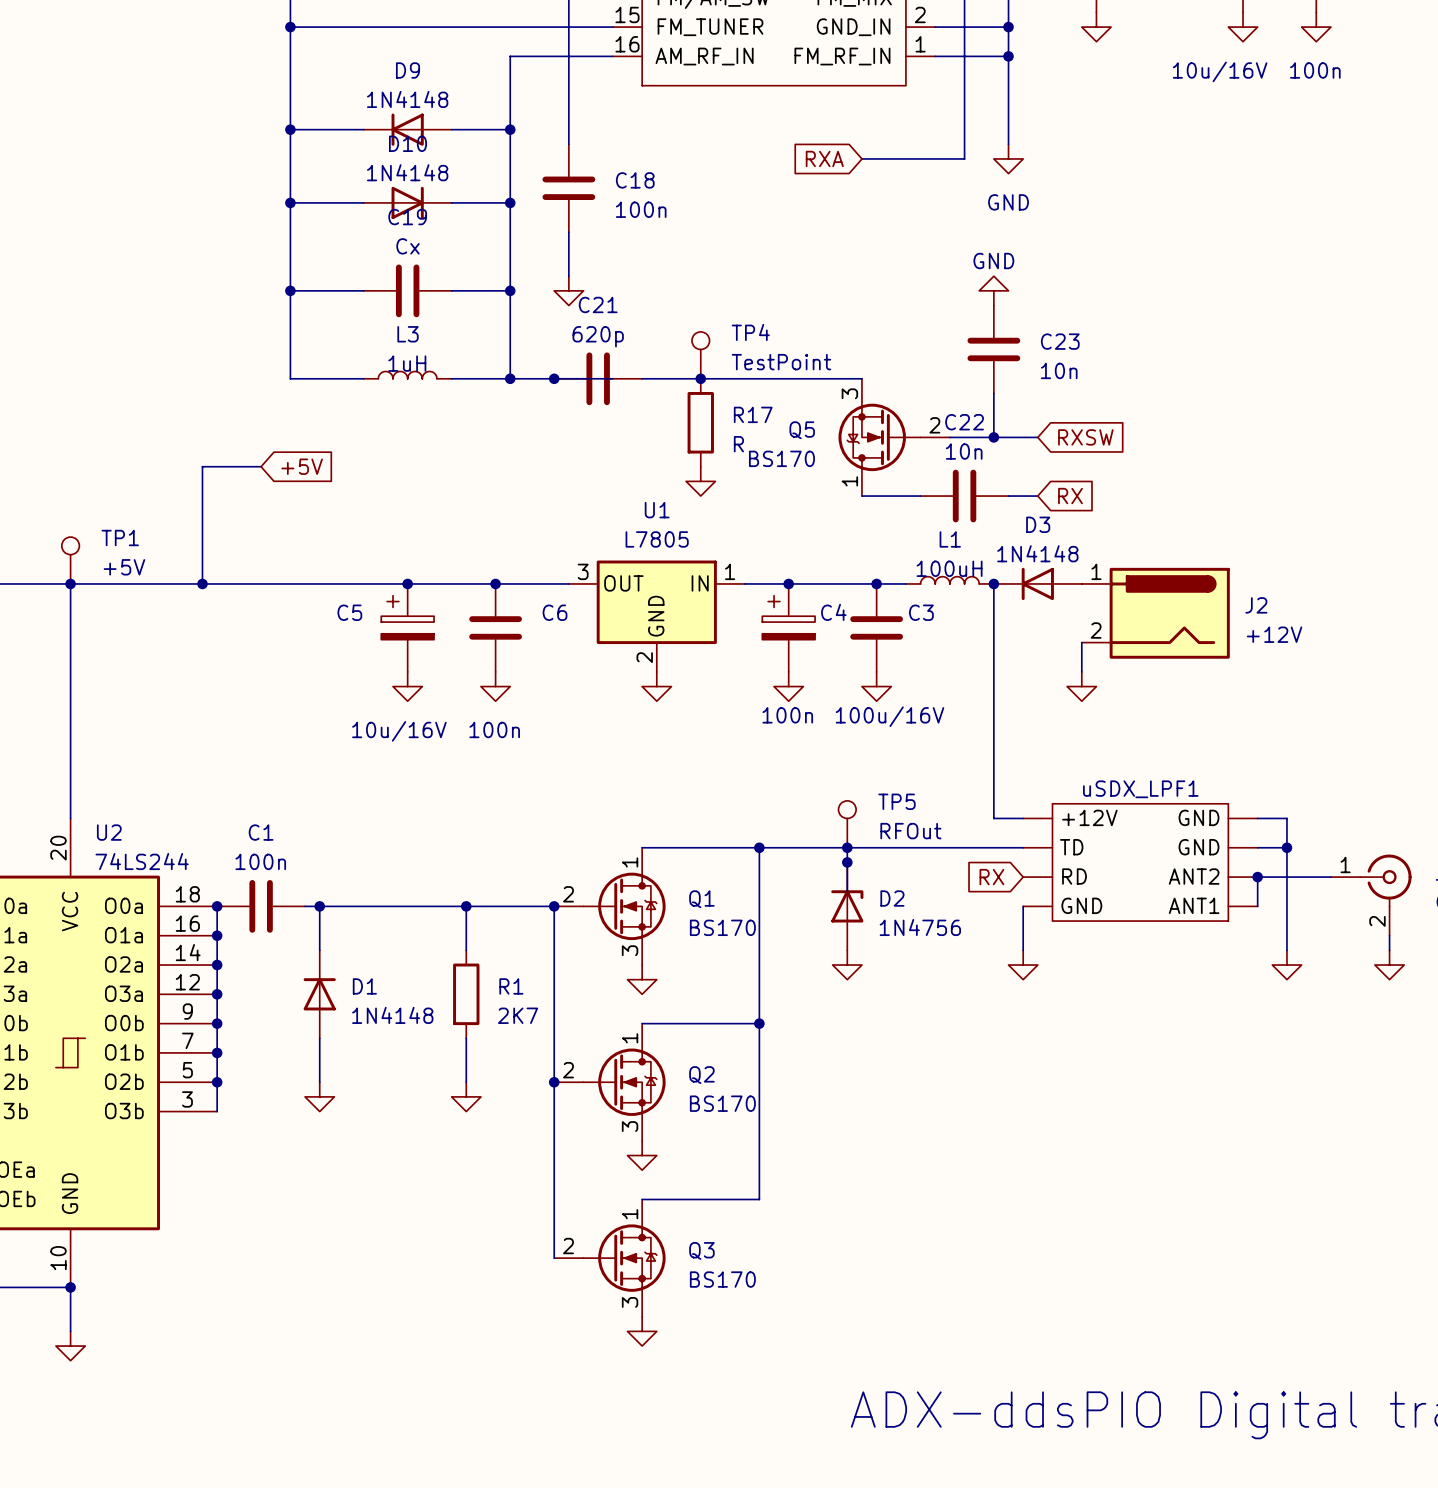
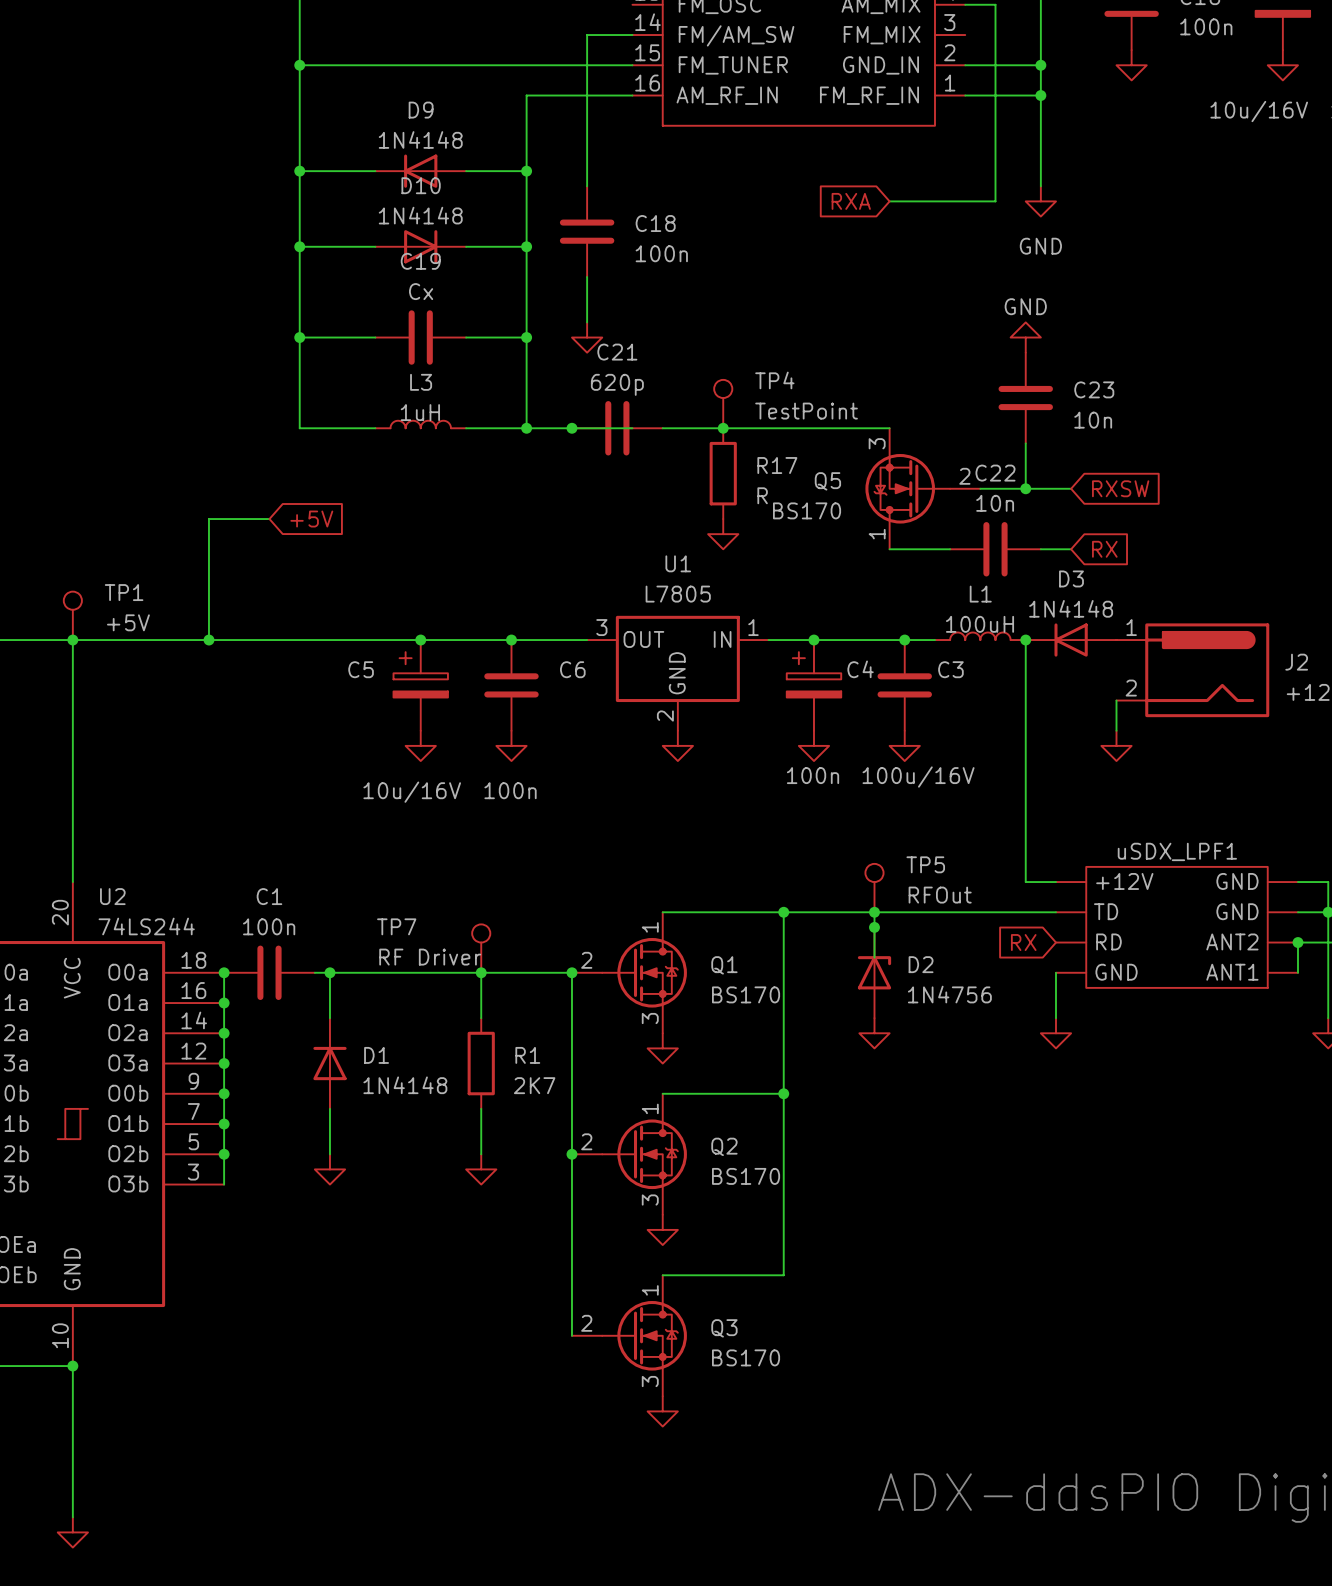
TP7: none -> RF Driver (481, 948)
wire: none -> (72, 1411) (72, 1517)
power symbol position: (70, 1346) -> (72, 1532)

